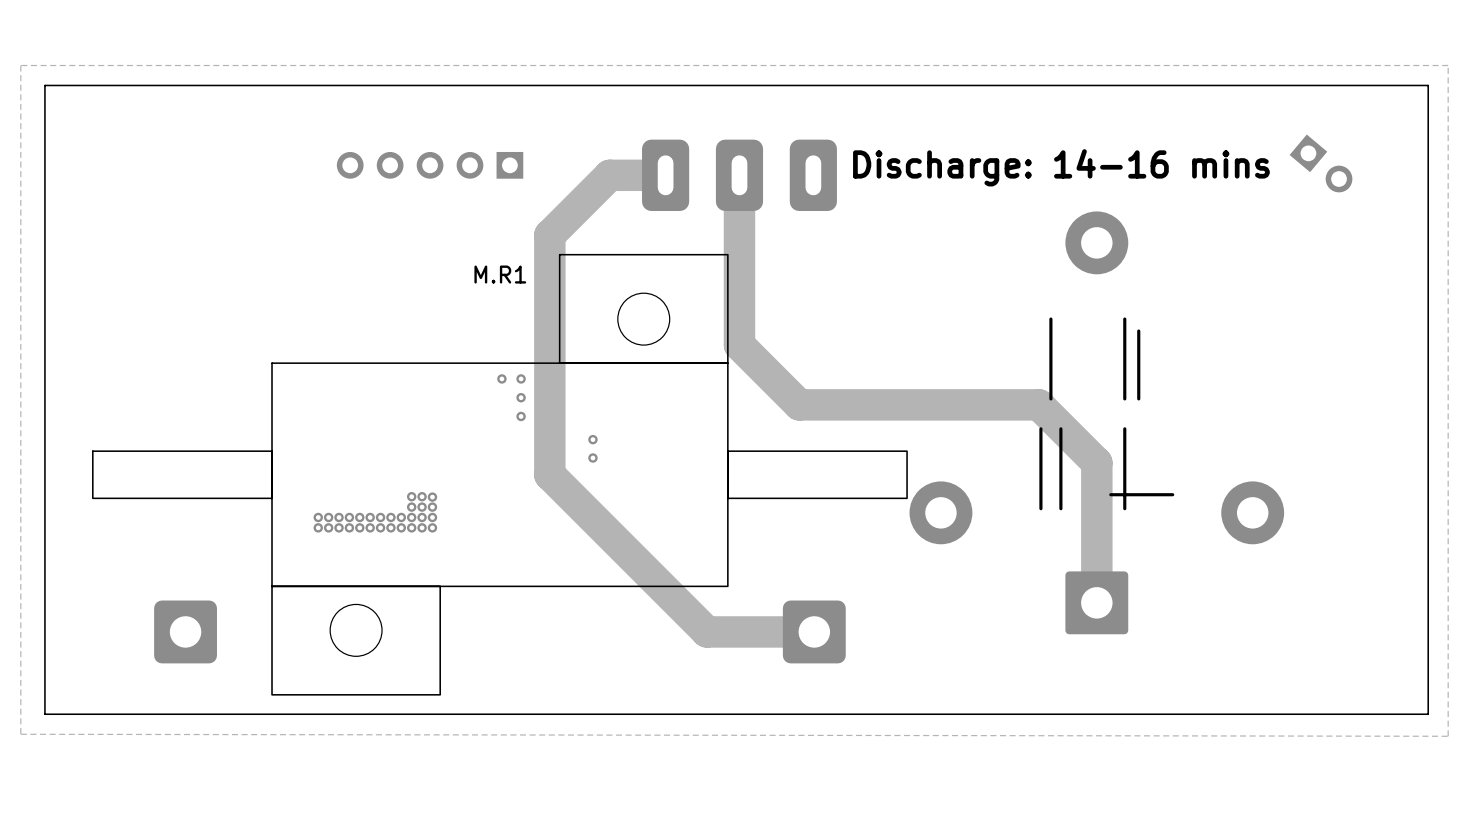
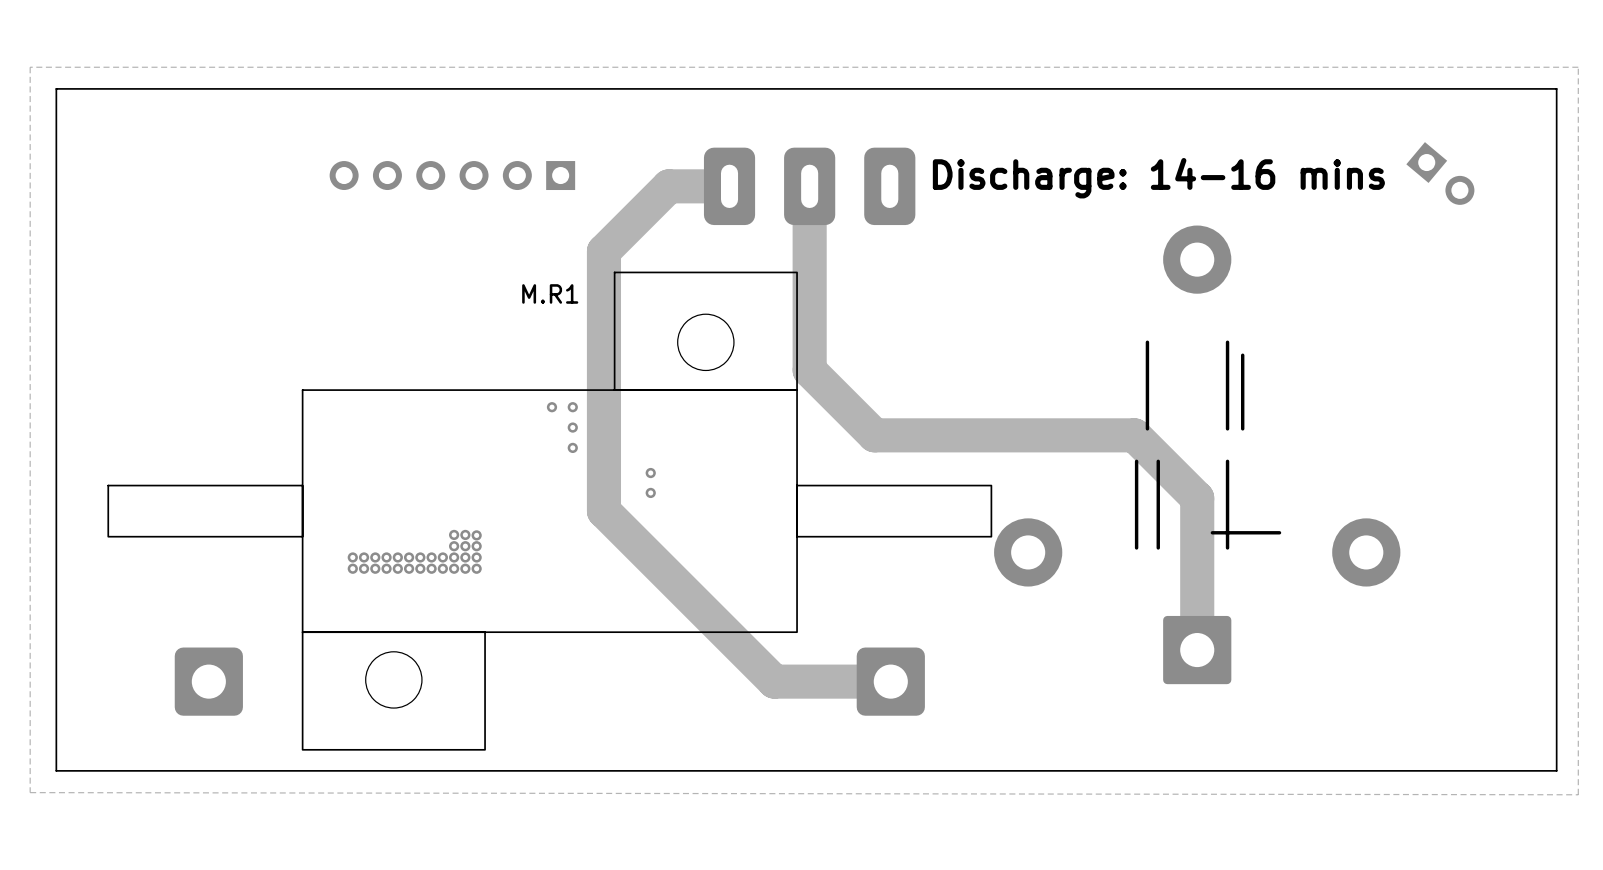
part: none -> (452, 175)

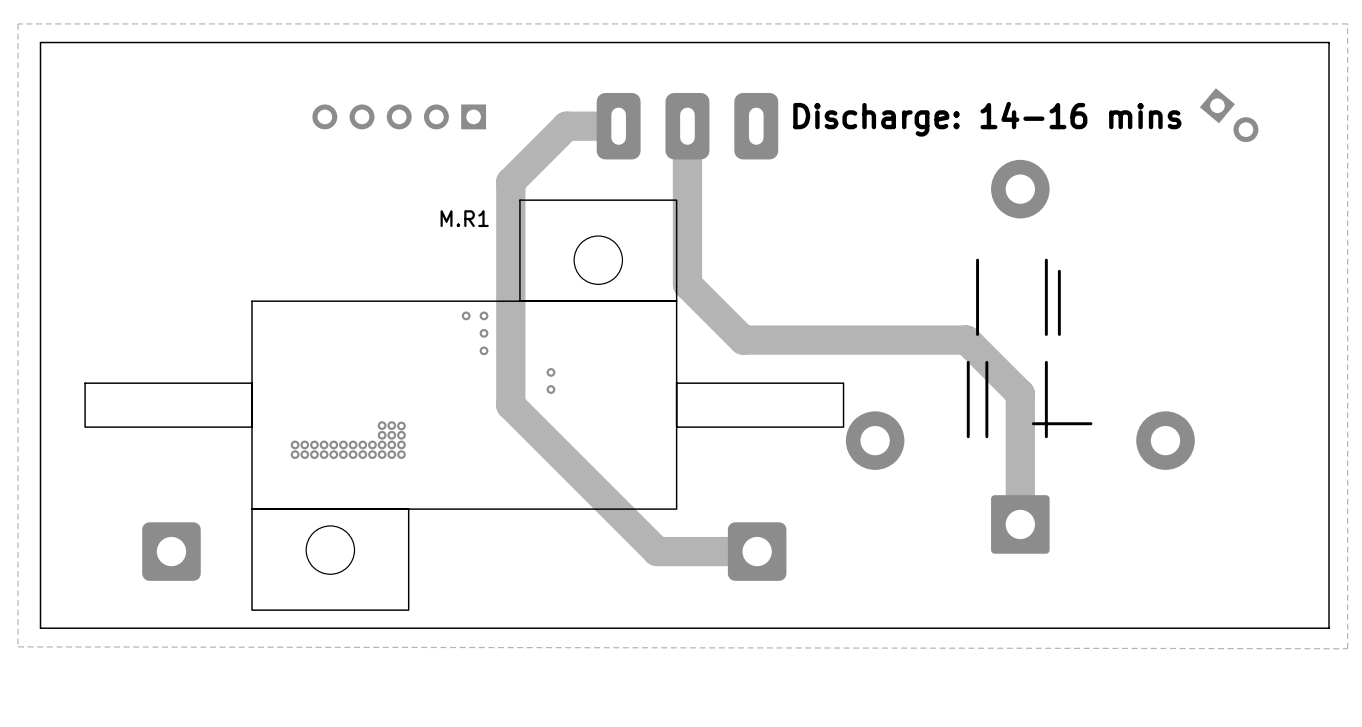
part: (452, 175) -> none

